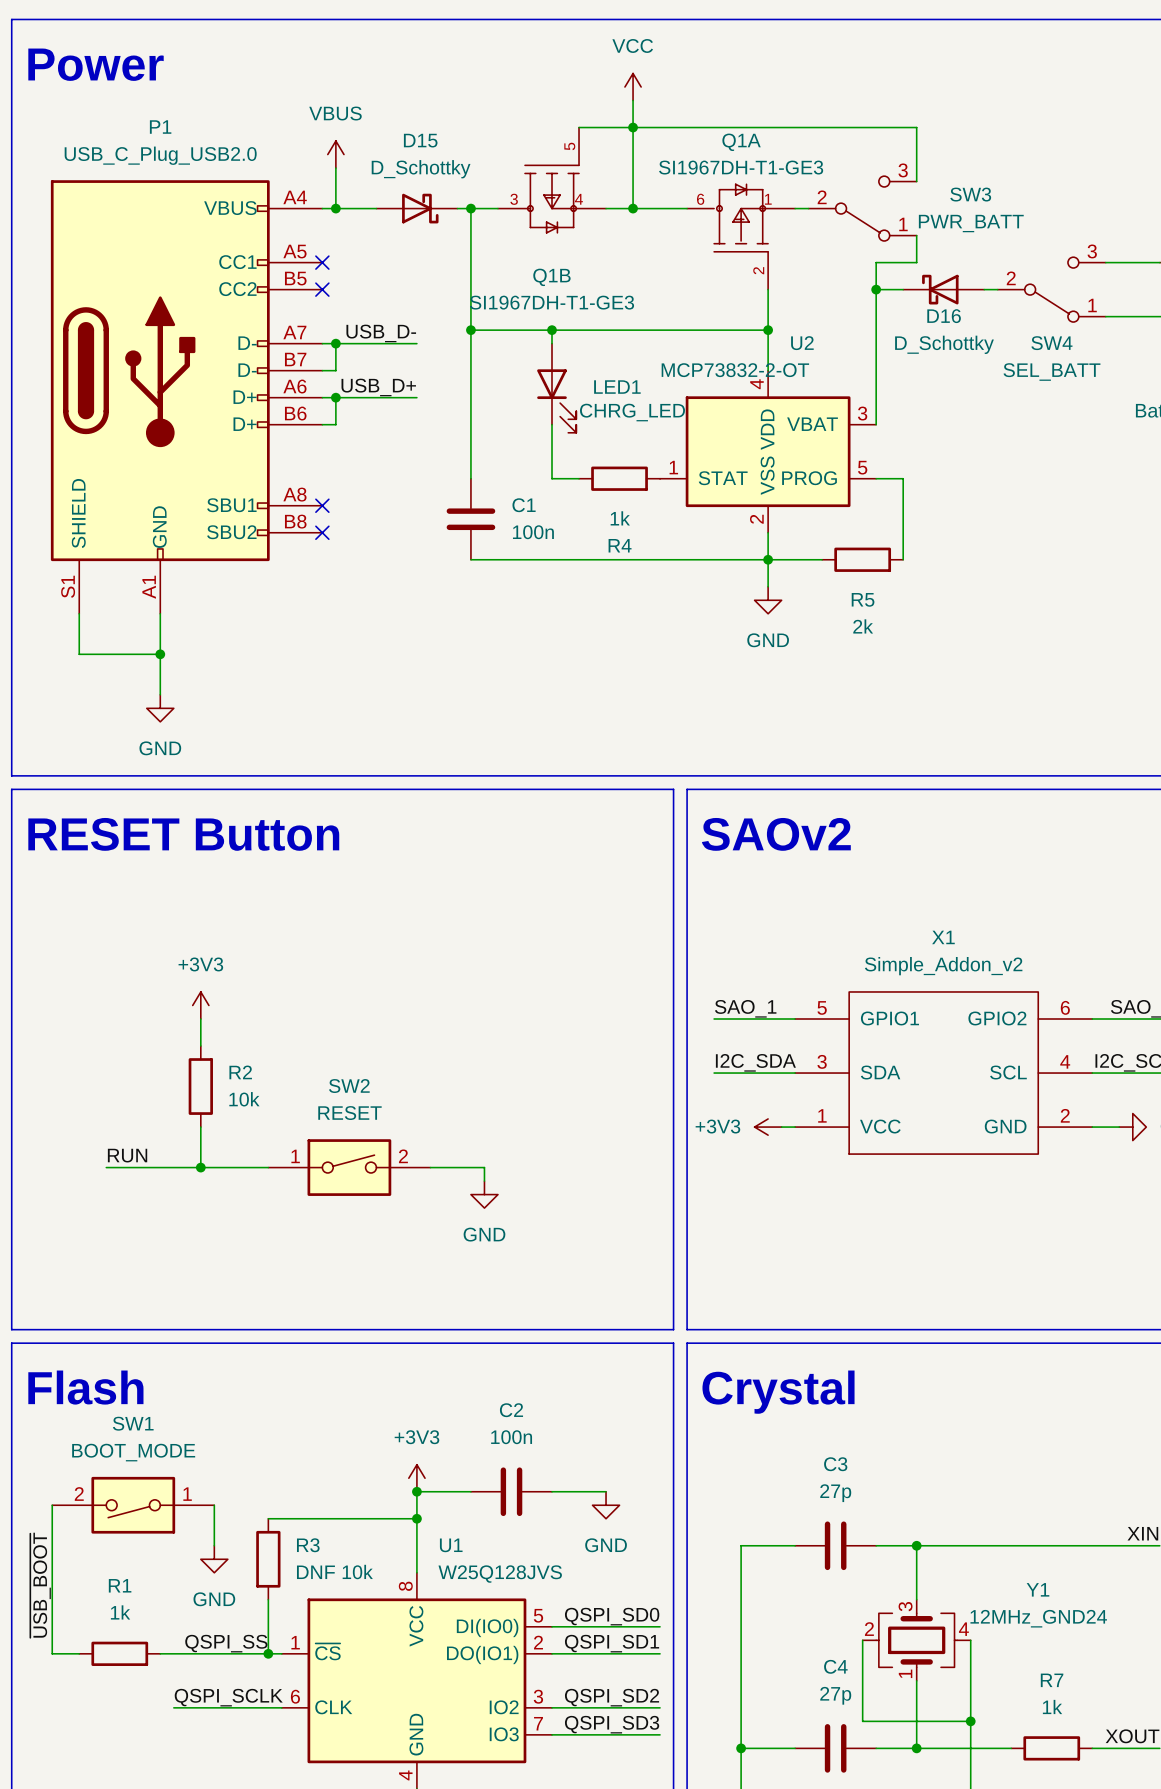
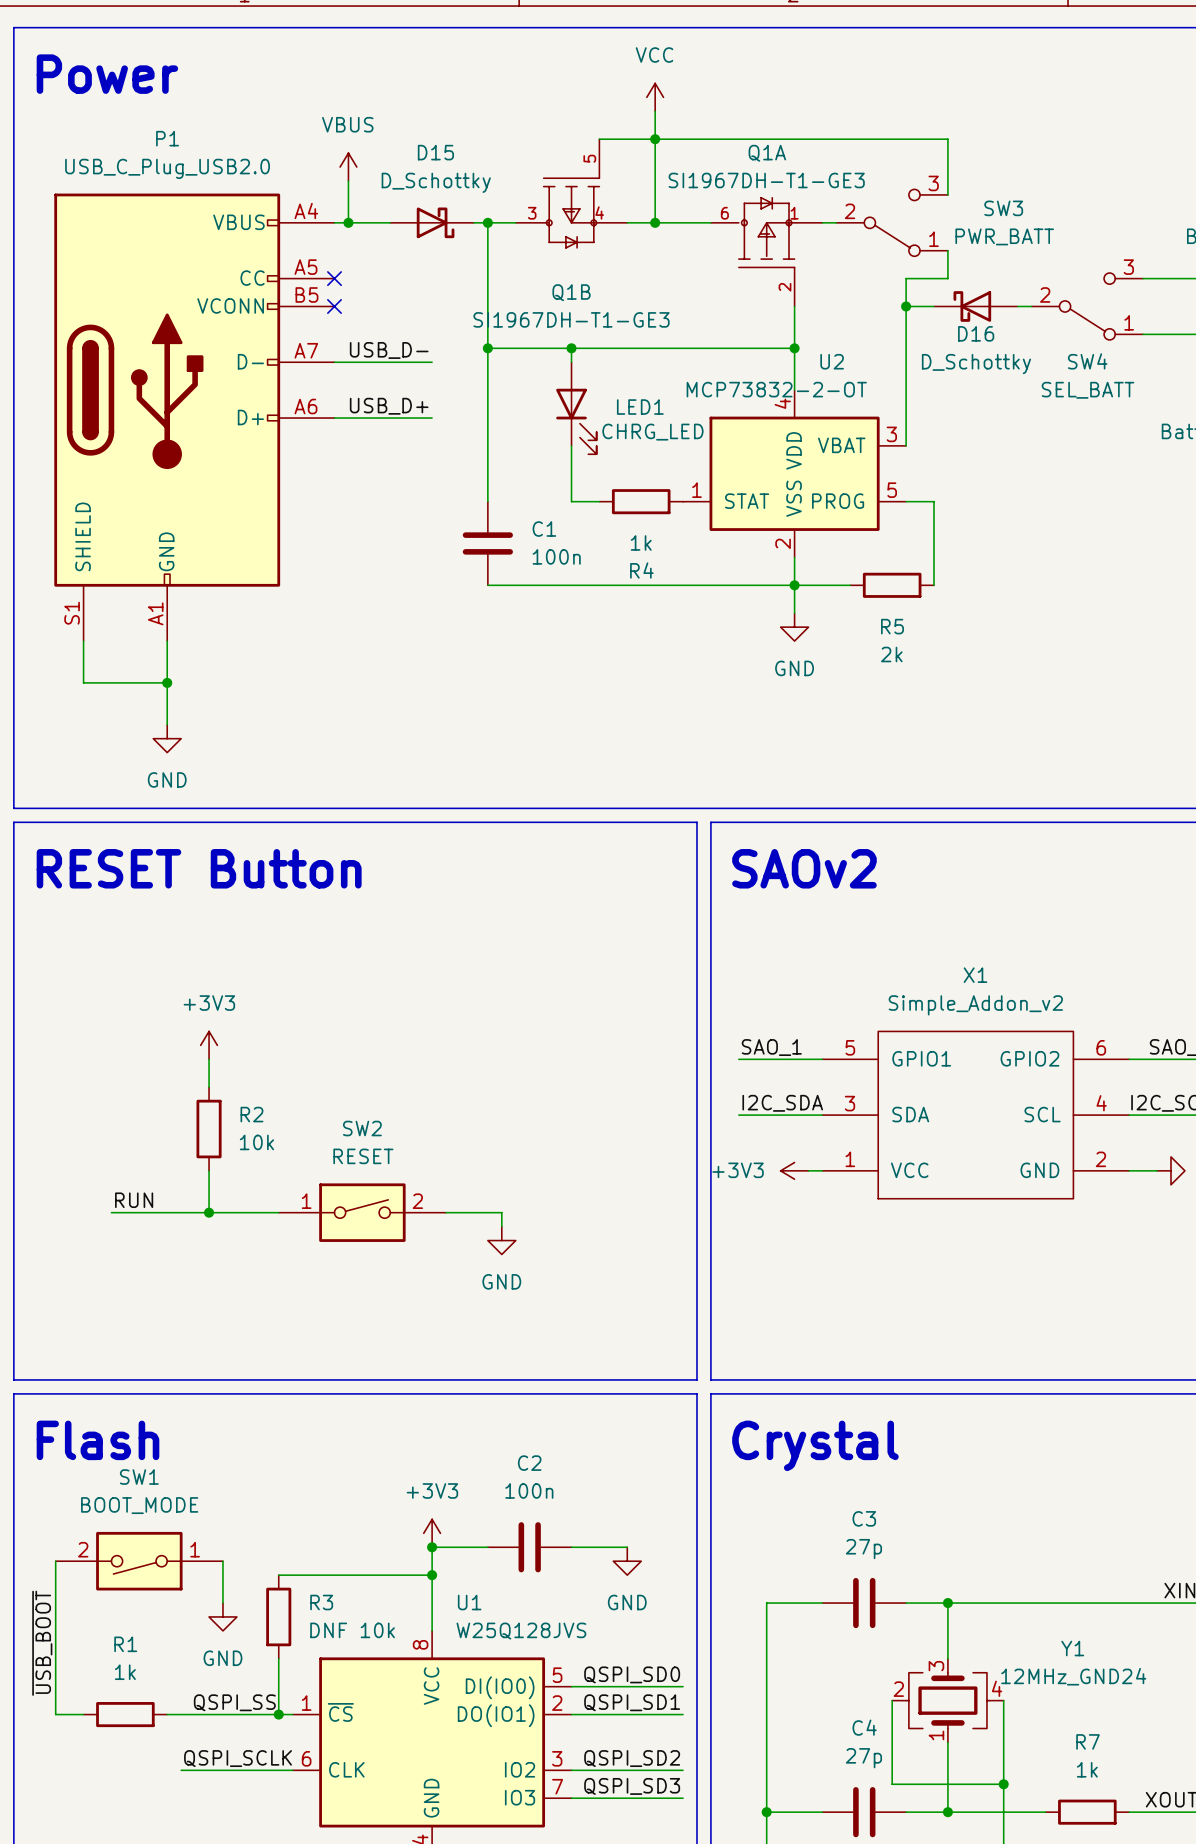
P1 symbol: [50, 180, 323, 614] -> [54, 193, 335, 642]
wire: (335, 343) (335, 370) (322, 370) -> none
junction: (335, 343) -> none
wire: (335, 397) (335, 424) (322, 424) -> none
junction: (335, 397) -> none
no-connect mark: (322, 505) -> none
no-connect mark: (322, 532) -> none

